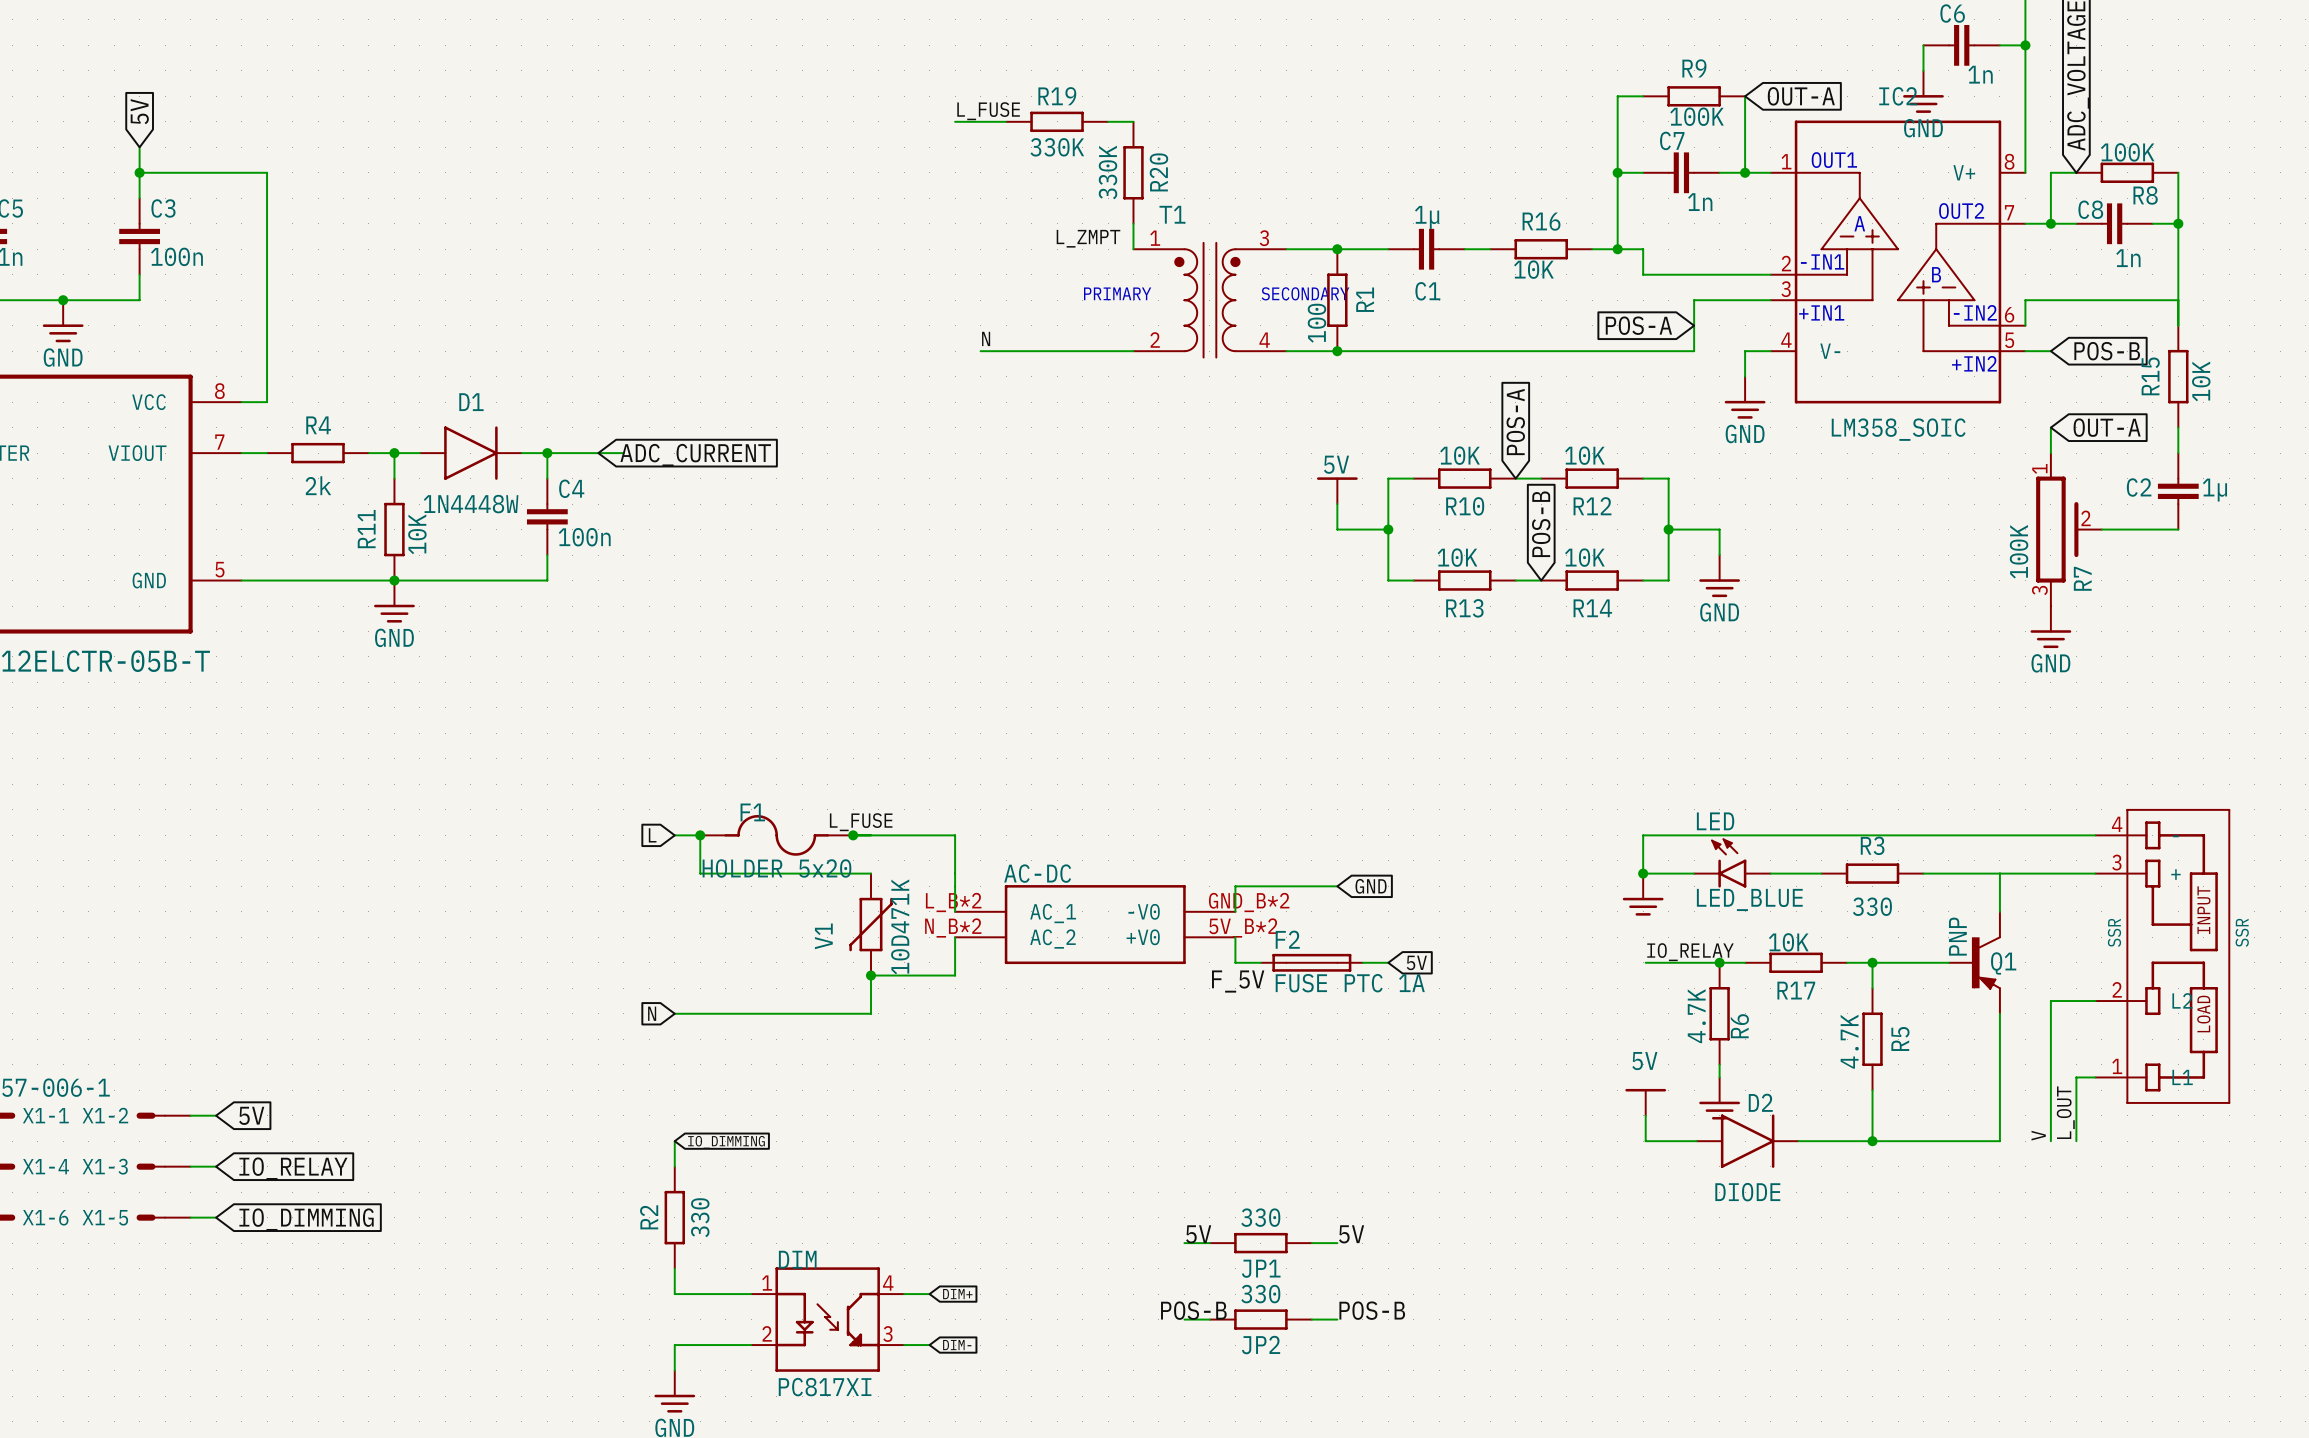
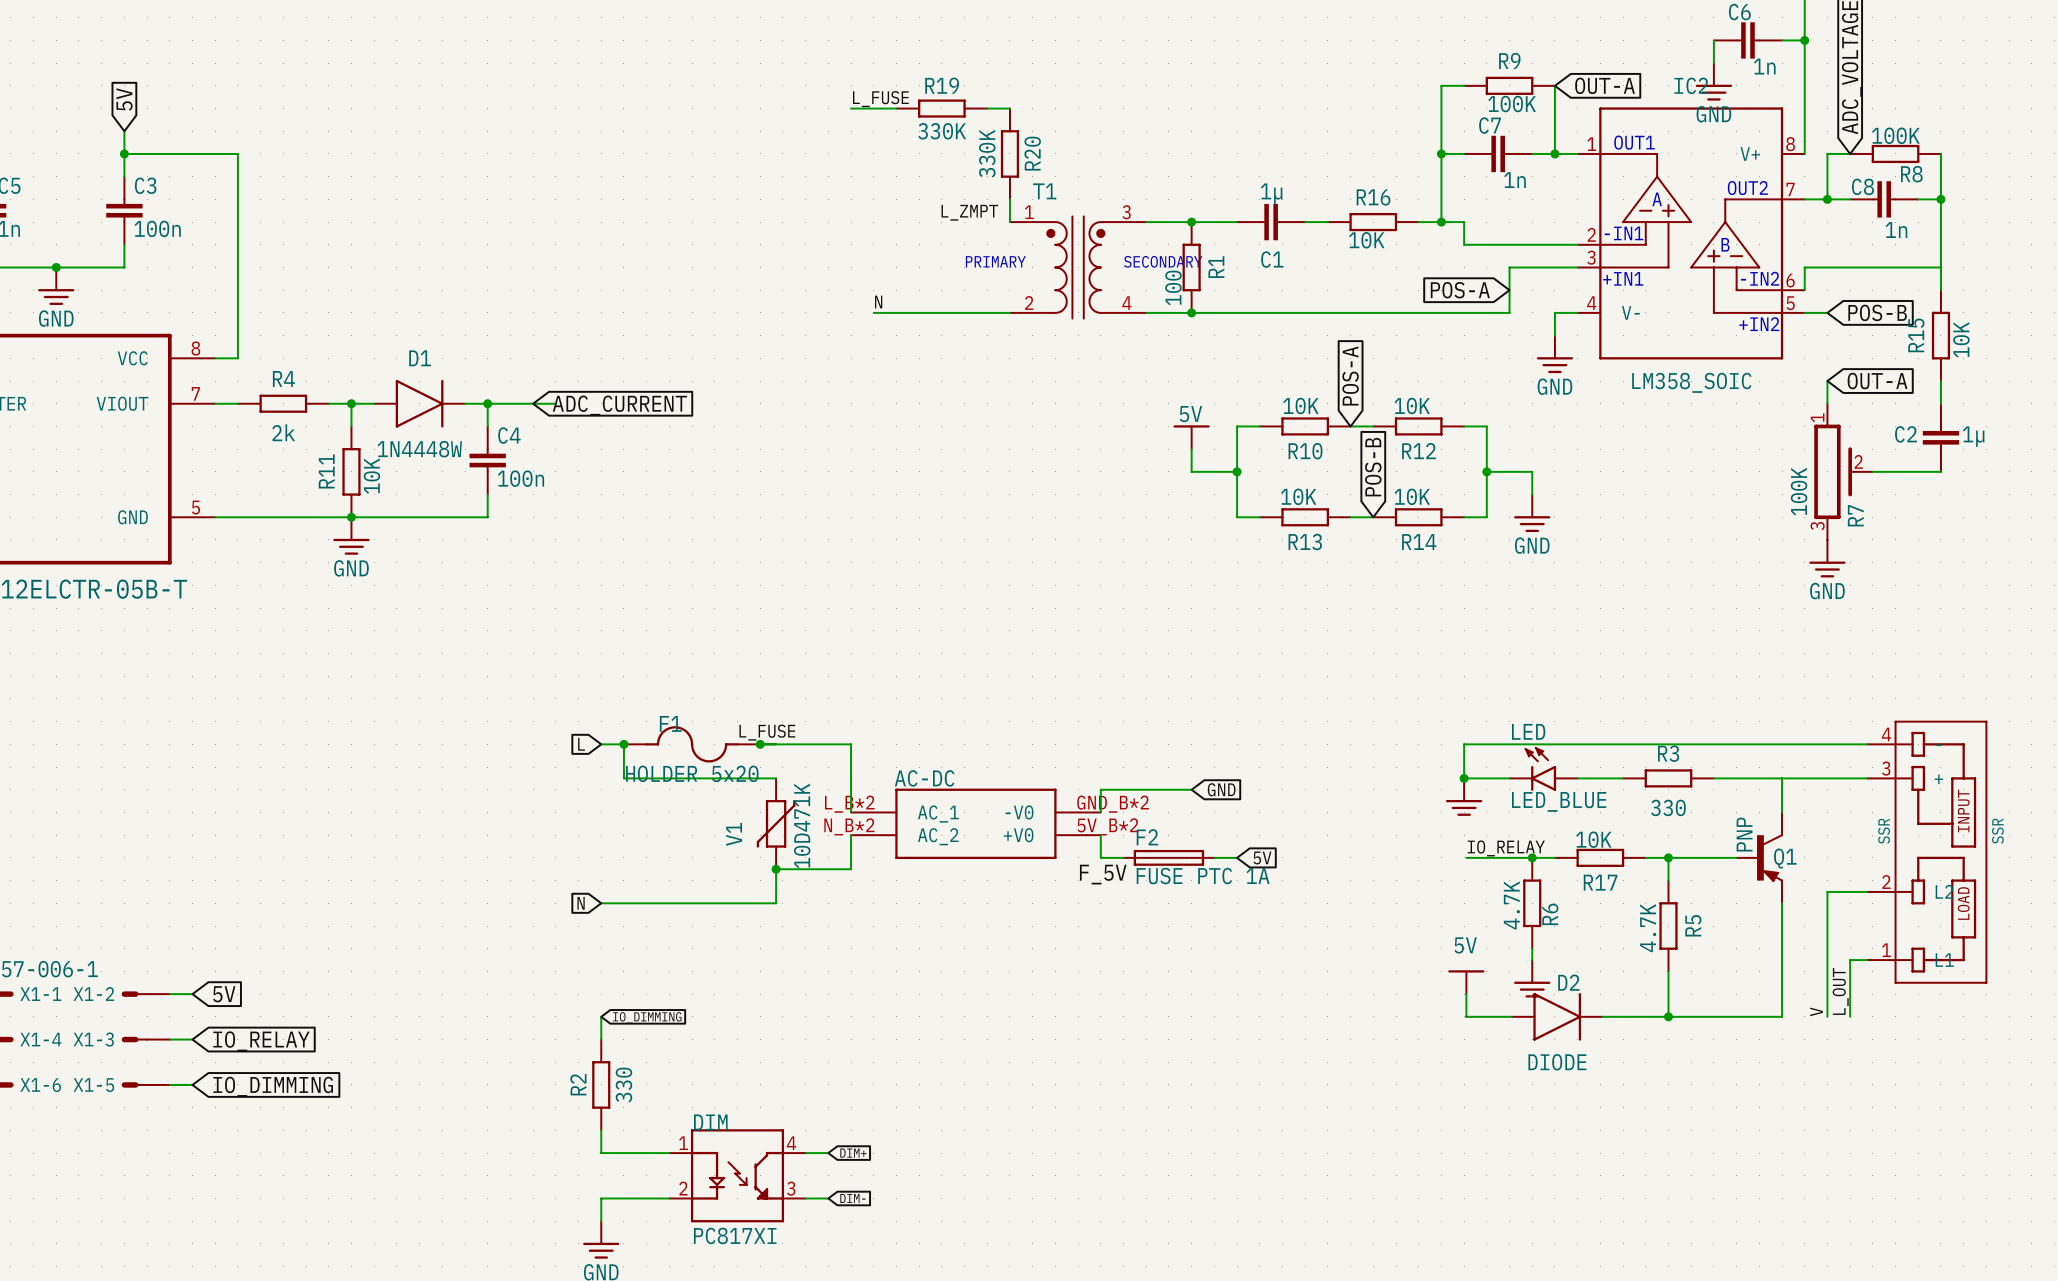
label: 5V (1198, 1234) -> none
label: 5V (1351, 1234) -> none
wire: (1184, 1243) (1209, 1243) -> none
JP1: 330 (1260, 1243) -> none
wire: (1311, 1243) (1337, 1243) -> none
label: POS-B (1193, 1310) -> none
label: POS-B (1372, 1310) -> none
wire: (1184, 1319) (1209, 1319) -> none
JP2: 330 (1260, 1319) -> none
wire: (1311, 1319) (1337, 1319) -> none

